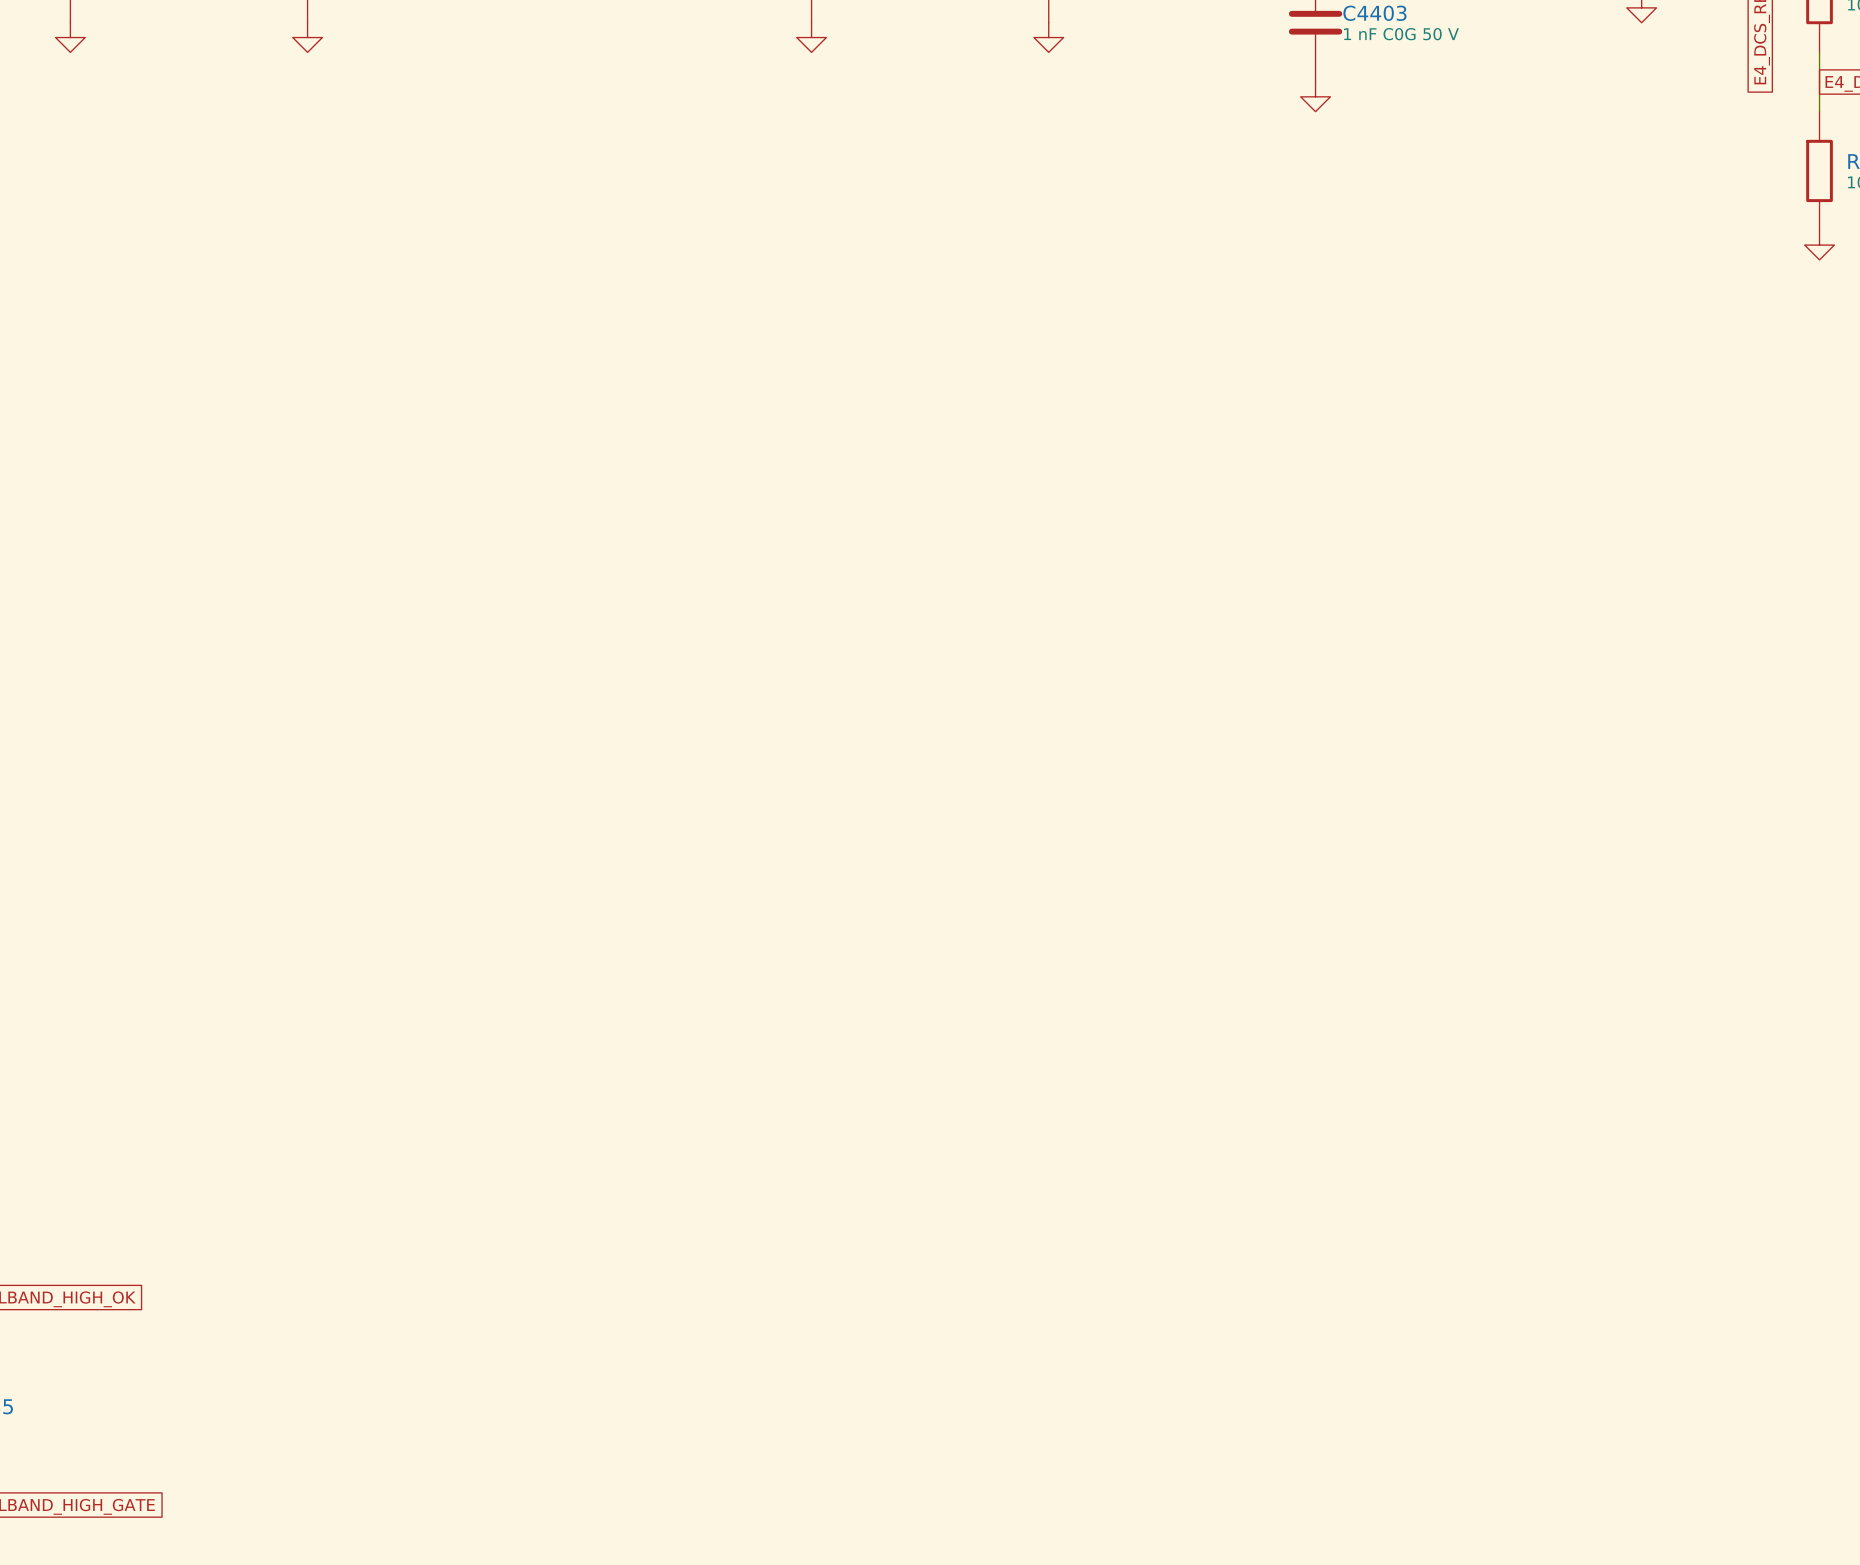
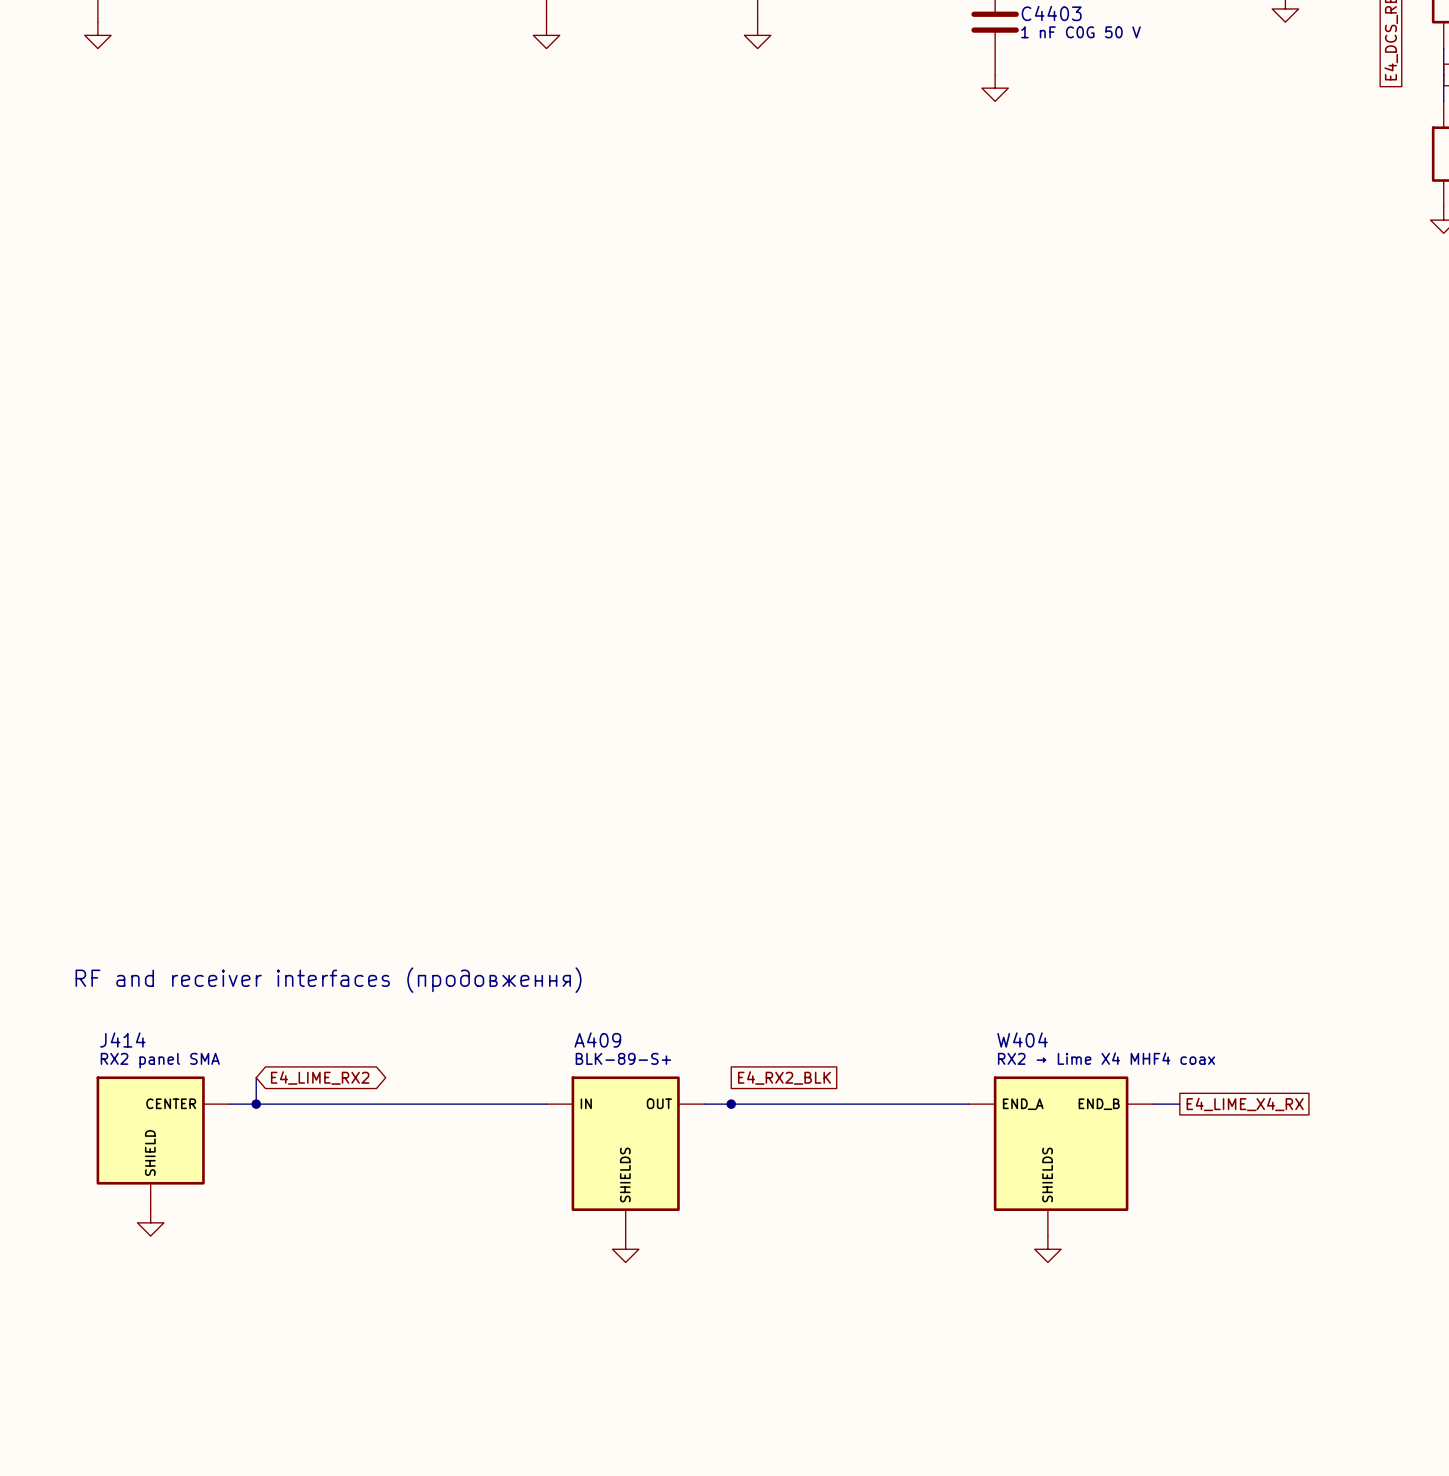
text: none -> RF and receiver interfaces (продовження) (328, 980)
wire: none -> (256, 1077) (256, 1104)
global label: none -> E4_LIME_RX2 (320, 1077)
global label: none -> E4_RX2_BLK (784, 1077)
wire: none -> (229, 1104) (546, 1104)
junction: none -> (256, 1104)
wire: none -> (704, 1104) (968, 1104)
junction: none -> (731, 1104)
wire: none -> (1153, 1104) (1179, 1104)
global label: none -> E4_LIME_X4_RX (1245, 1104)
J414: none -> RX2 panel SMA (163, 1143)
A409: none -> BLK-89-S+ (625, 1156)
W404: none -> RX2 → Lime X4 MHF4 coax (1061, 1156)
power symbol: none -> (150, 1222)
power symbol: none -> (625, 1249)
power symbol: none -> (1047, 1249)

